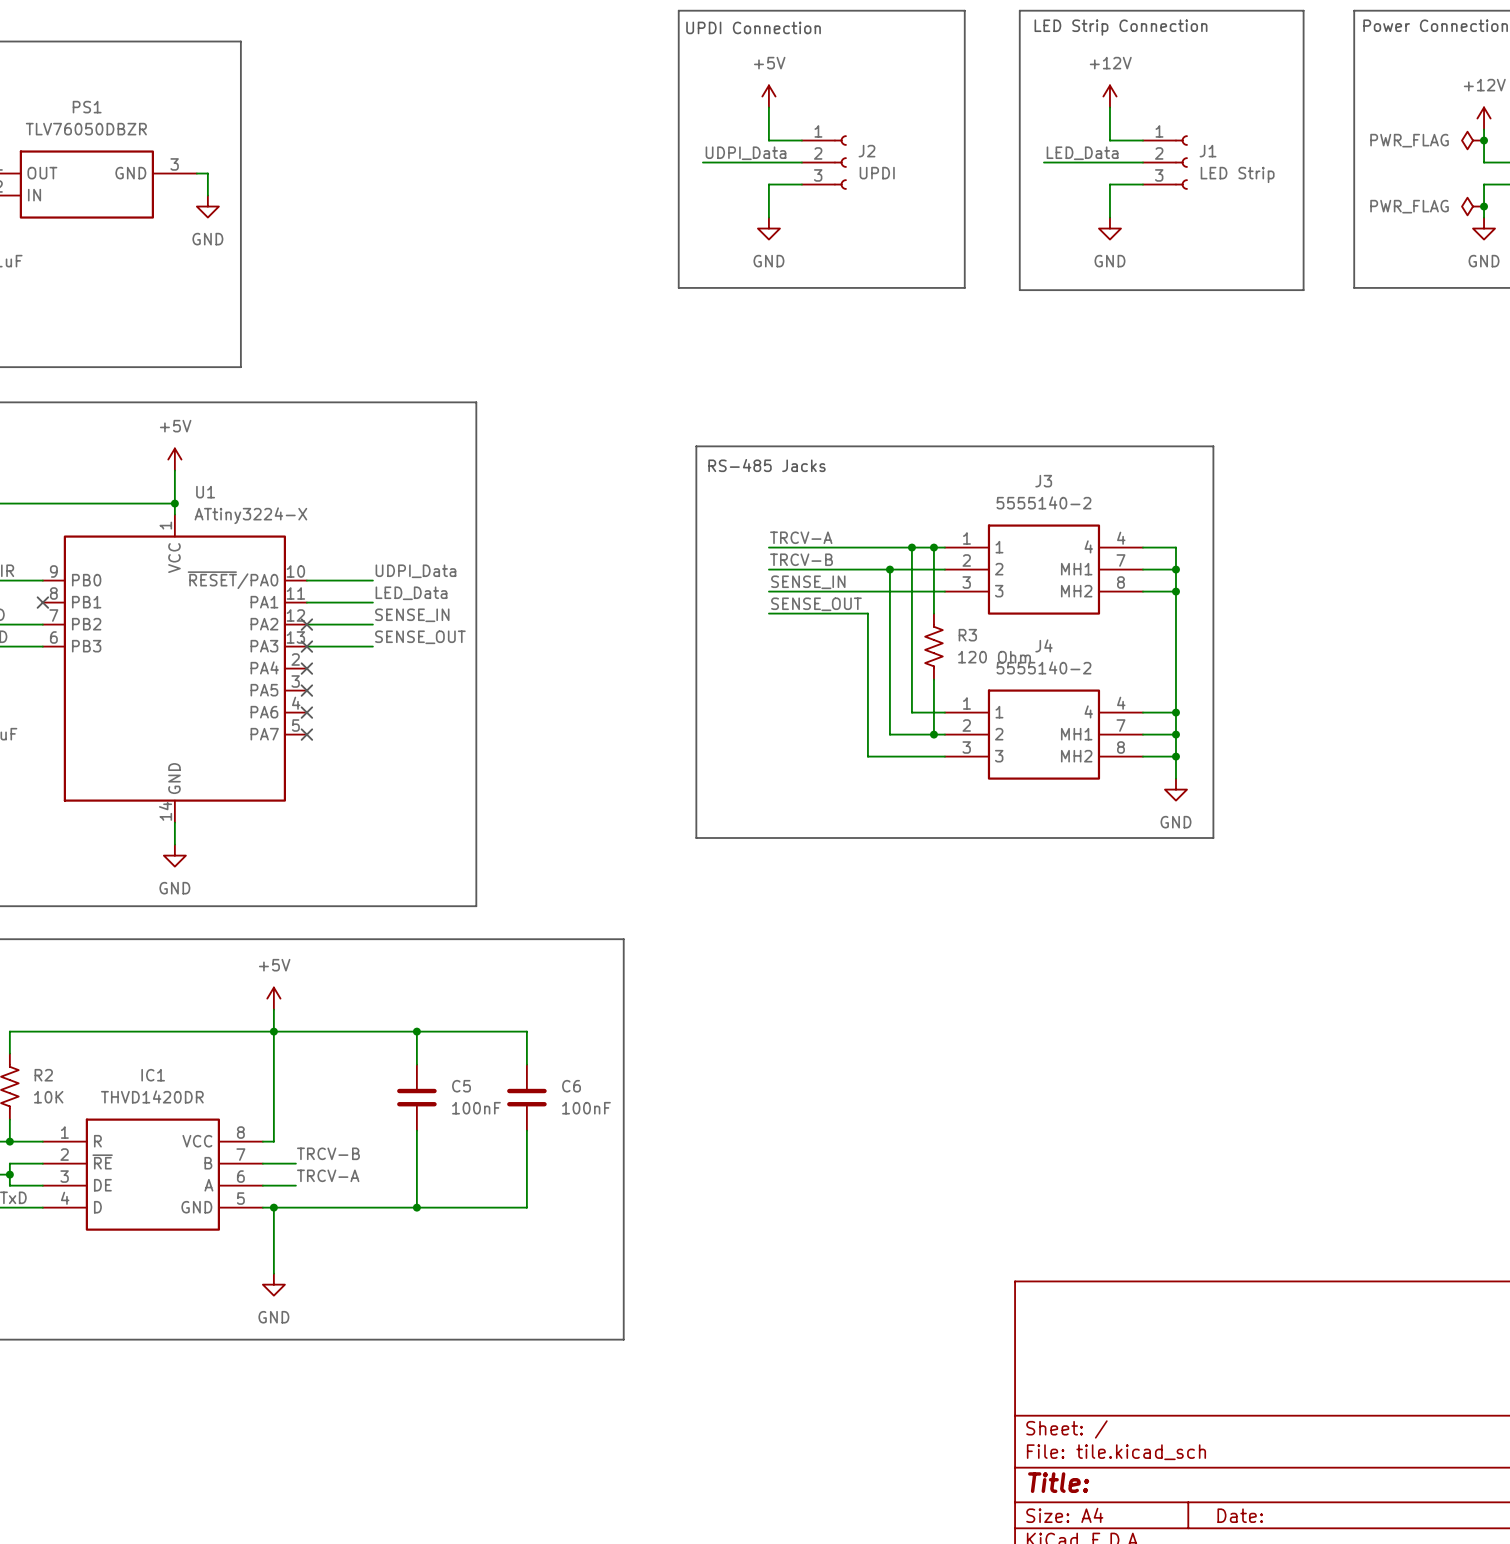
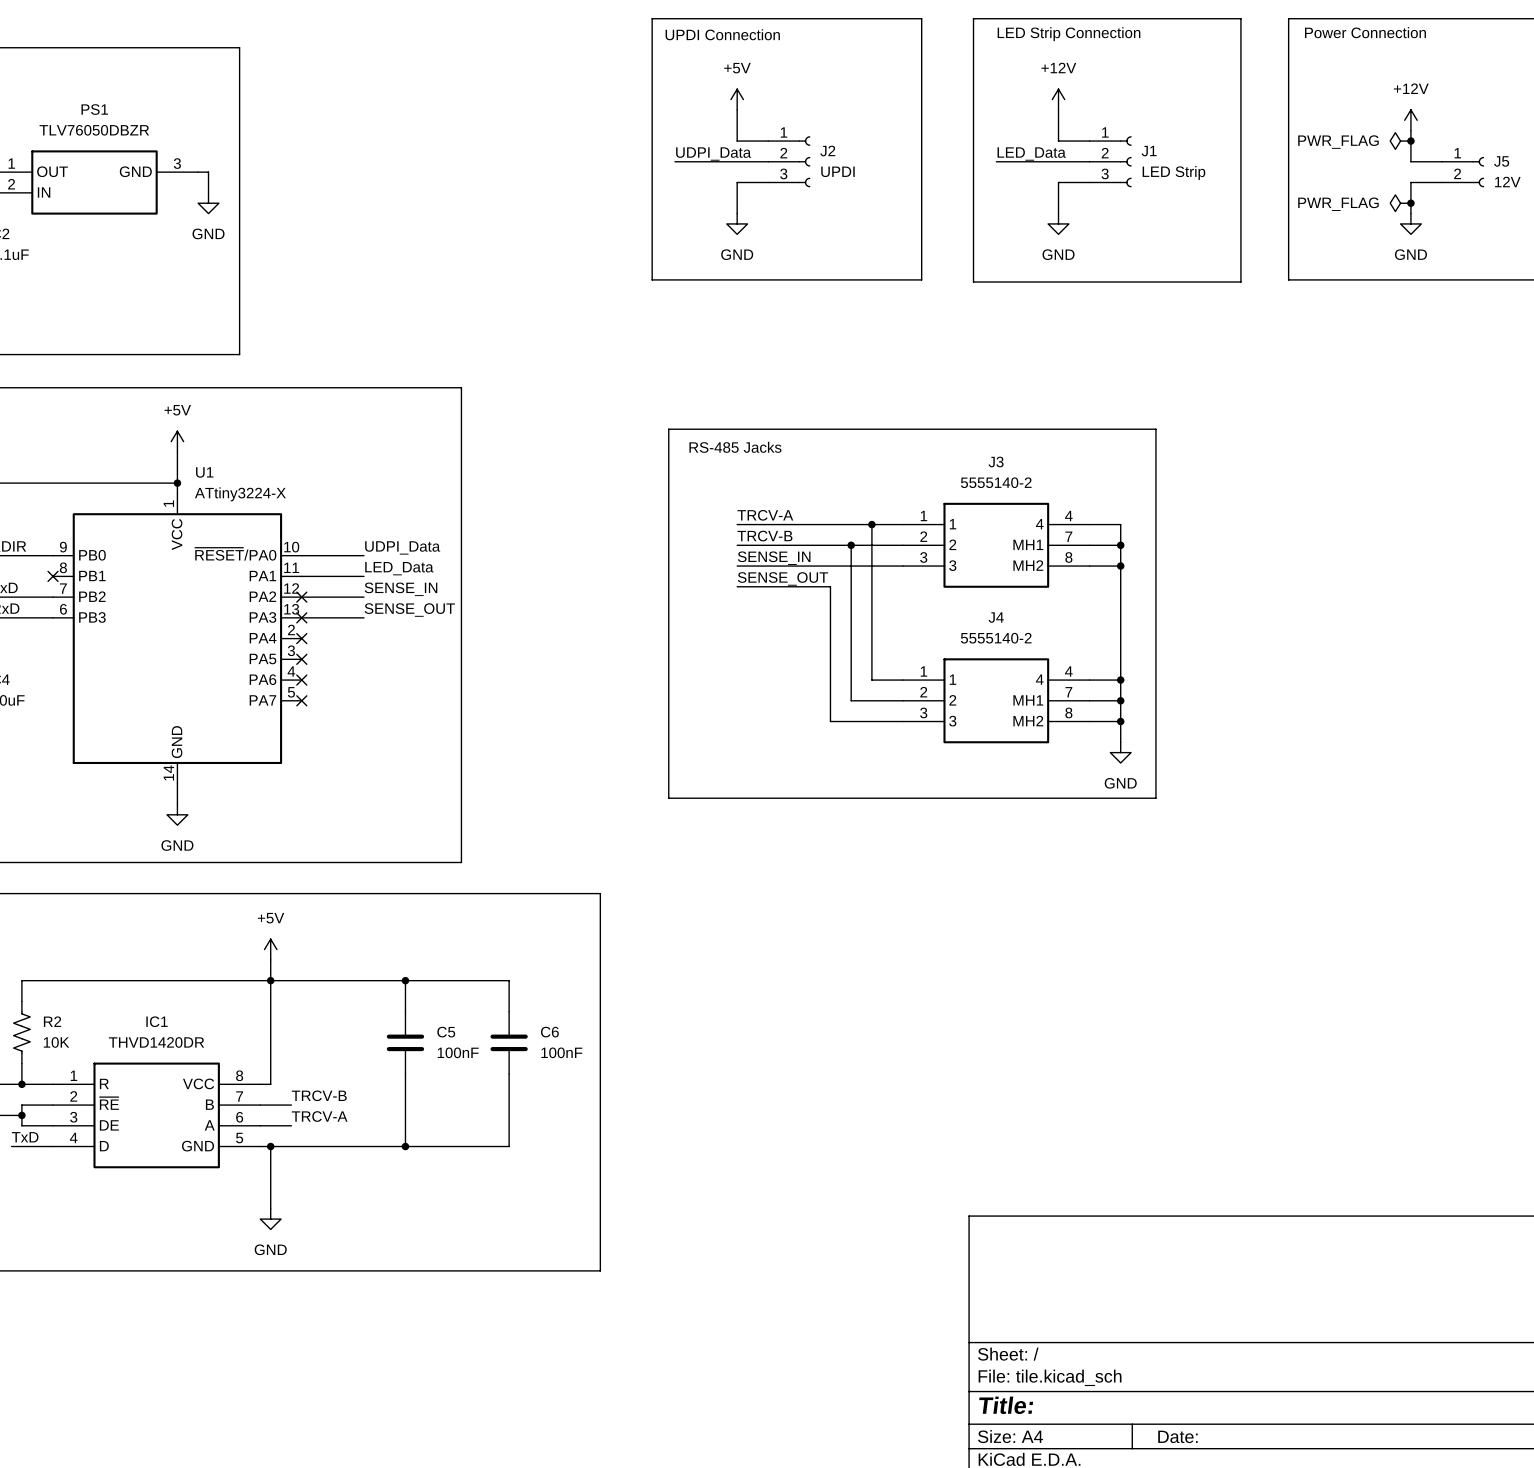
wire: (933, 547) (933, 613) -> none
junction: (933, 547) -> none
R3: 120 Ohm (933, 646) -> none
wire: (933, 679) (933, 734) -> none
junction: (933, 734) -> none

